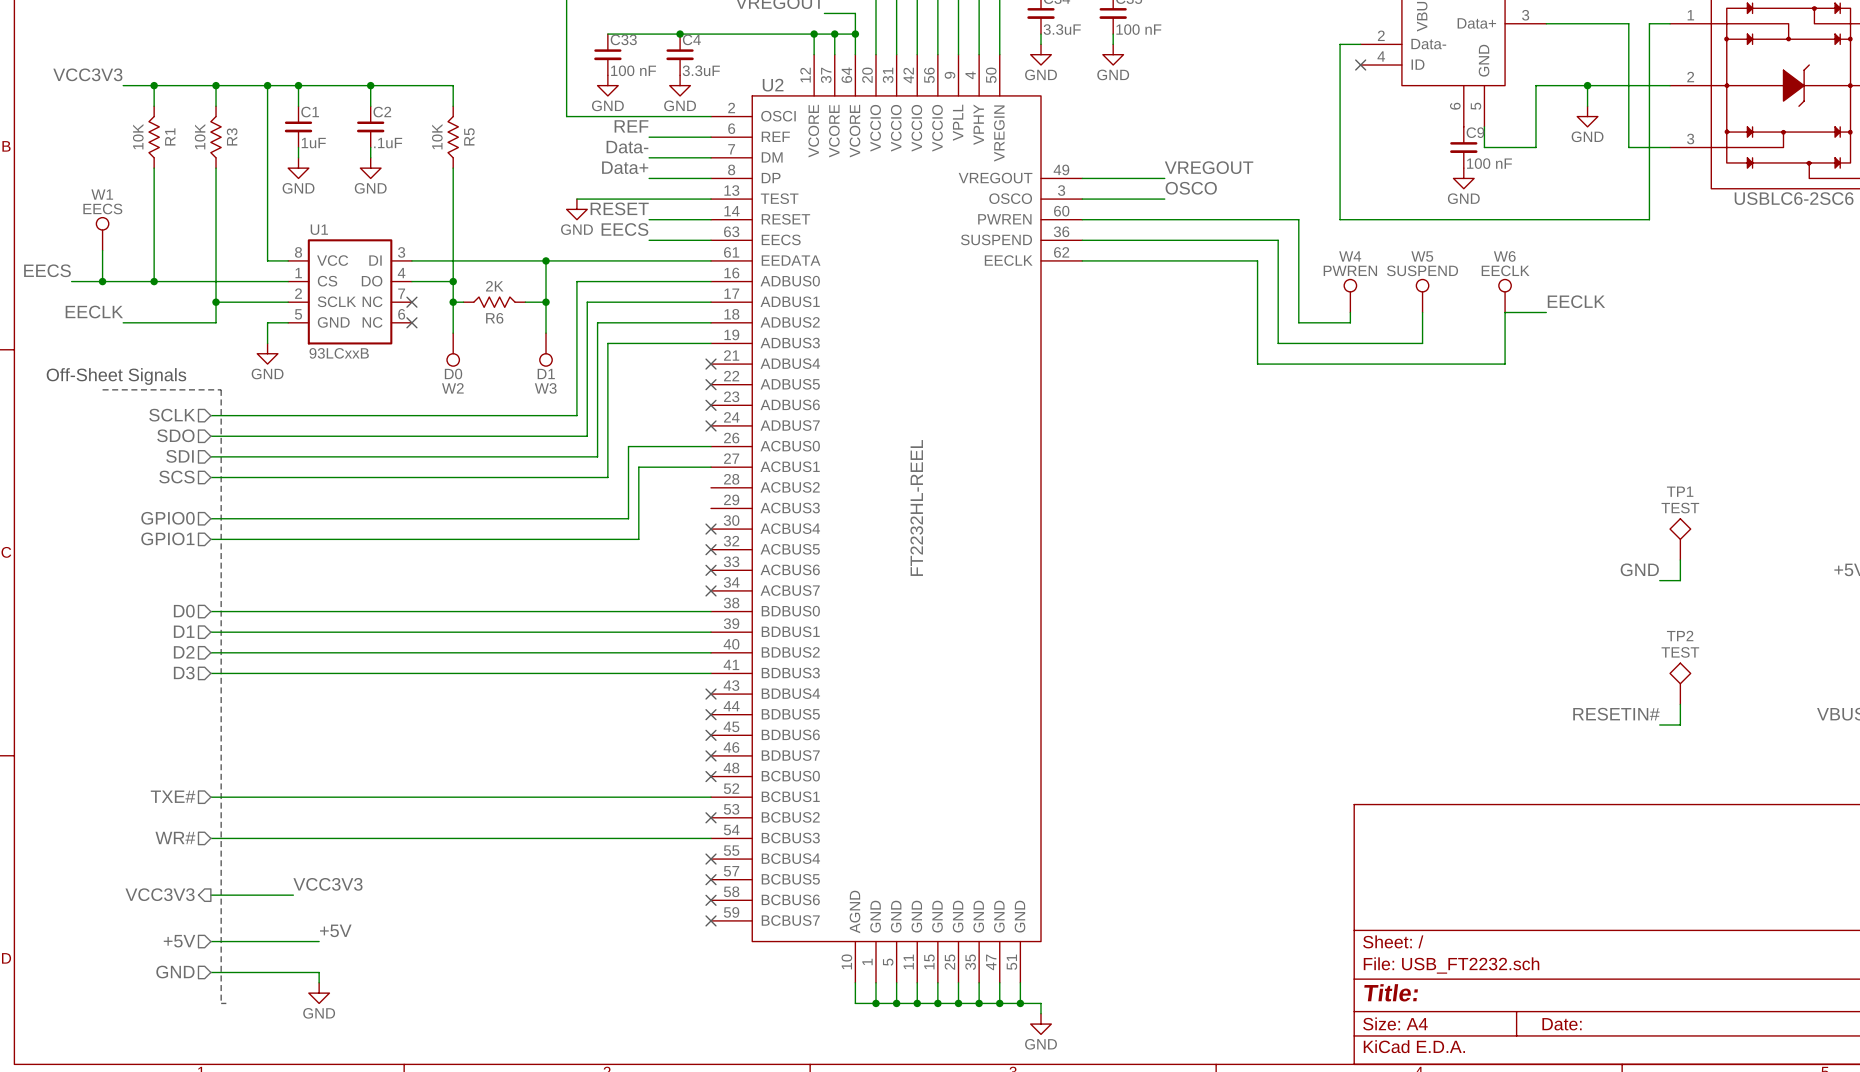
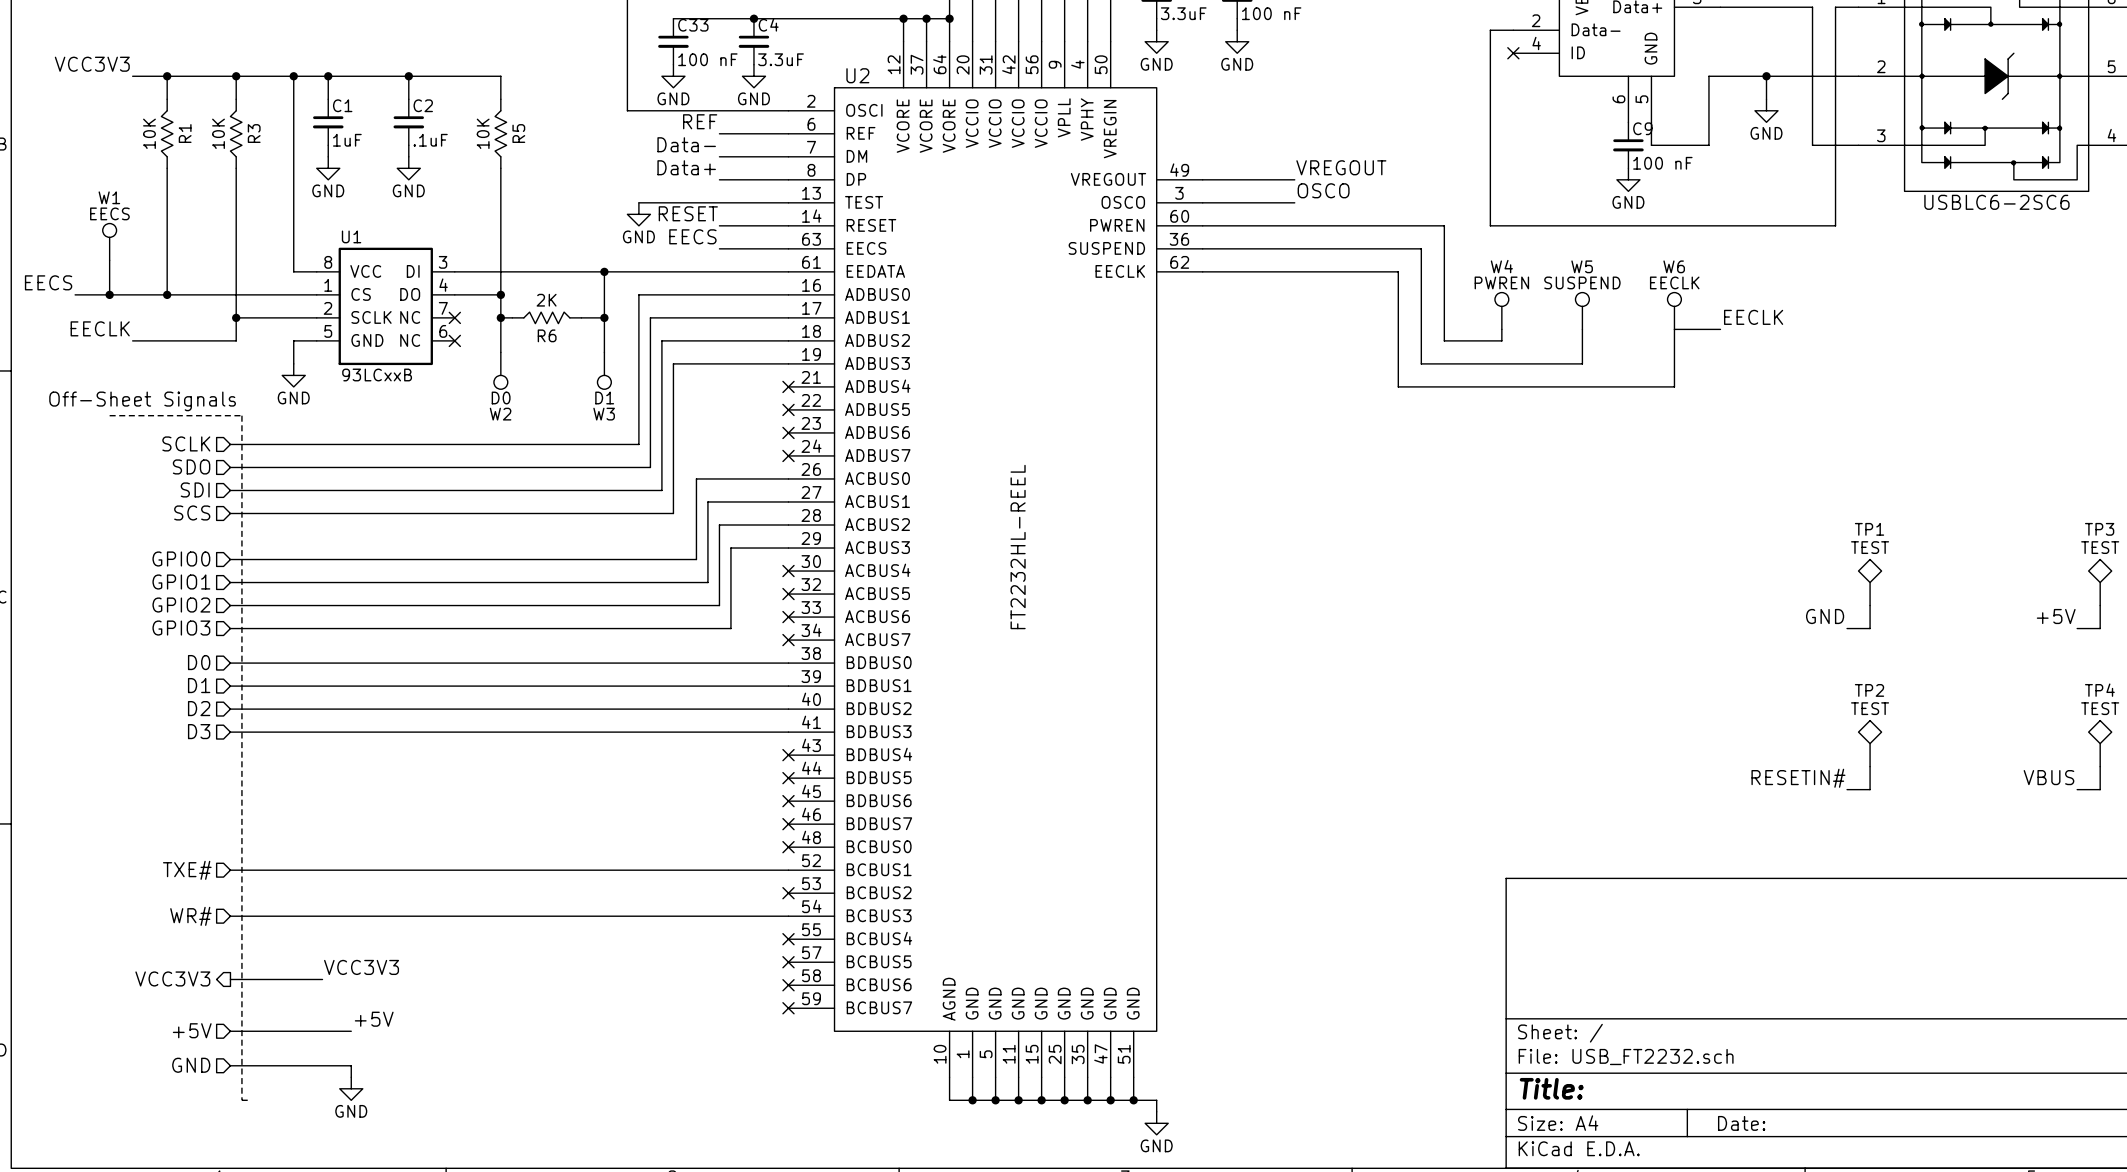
wire: none -> (788, 525) (719, 525) (719, 605) (230, 605)
wire: none -> (788, 548) (730, 548) (730, 628) (230, 628)
hierarchical label: none -> GPIO2 (181, 605)
hierarchical label: none -> GPIO3 (181, 628)

